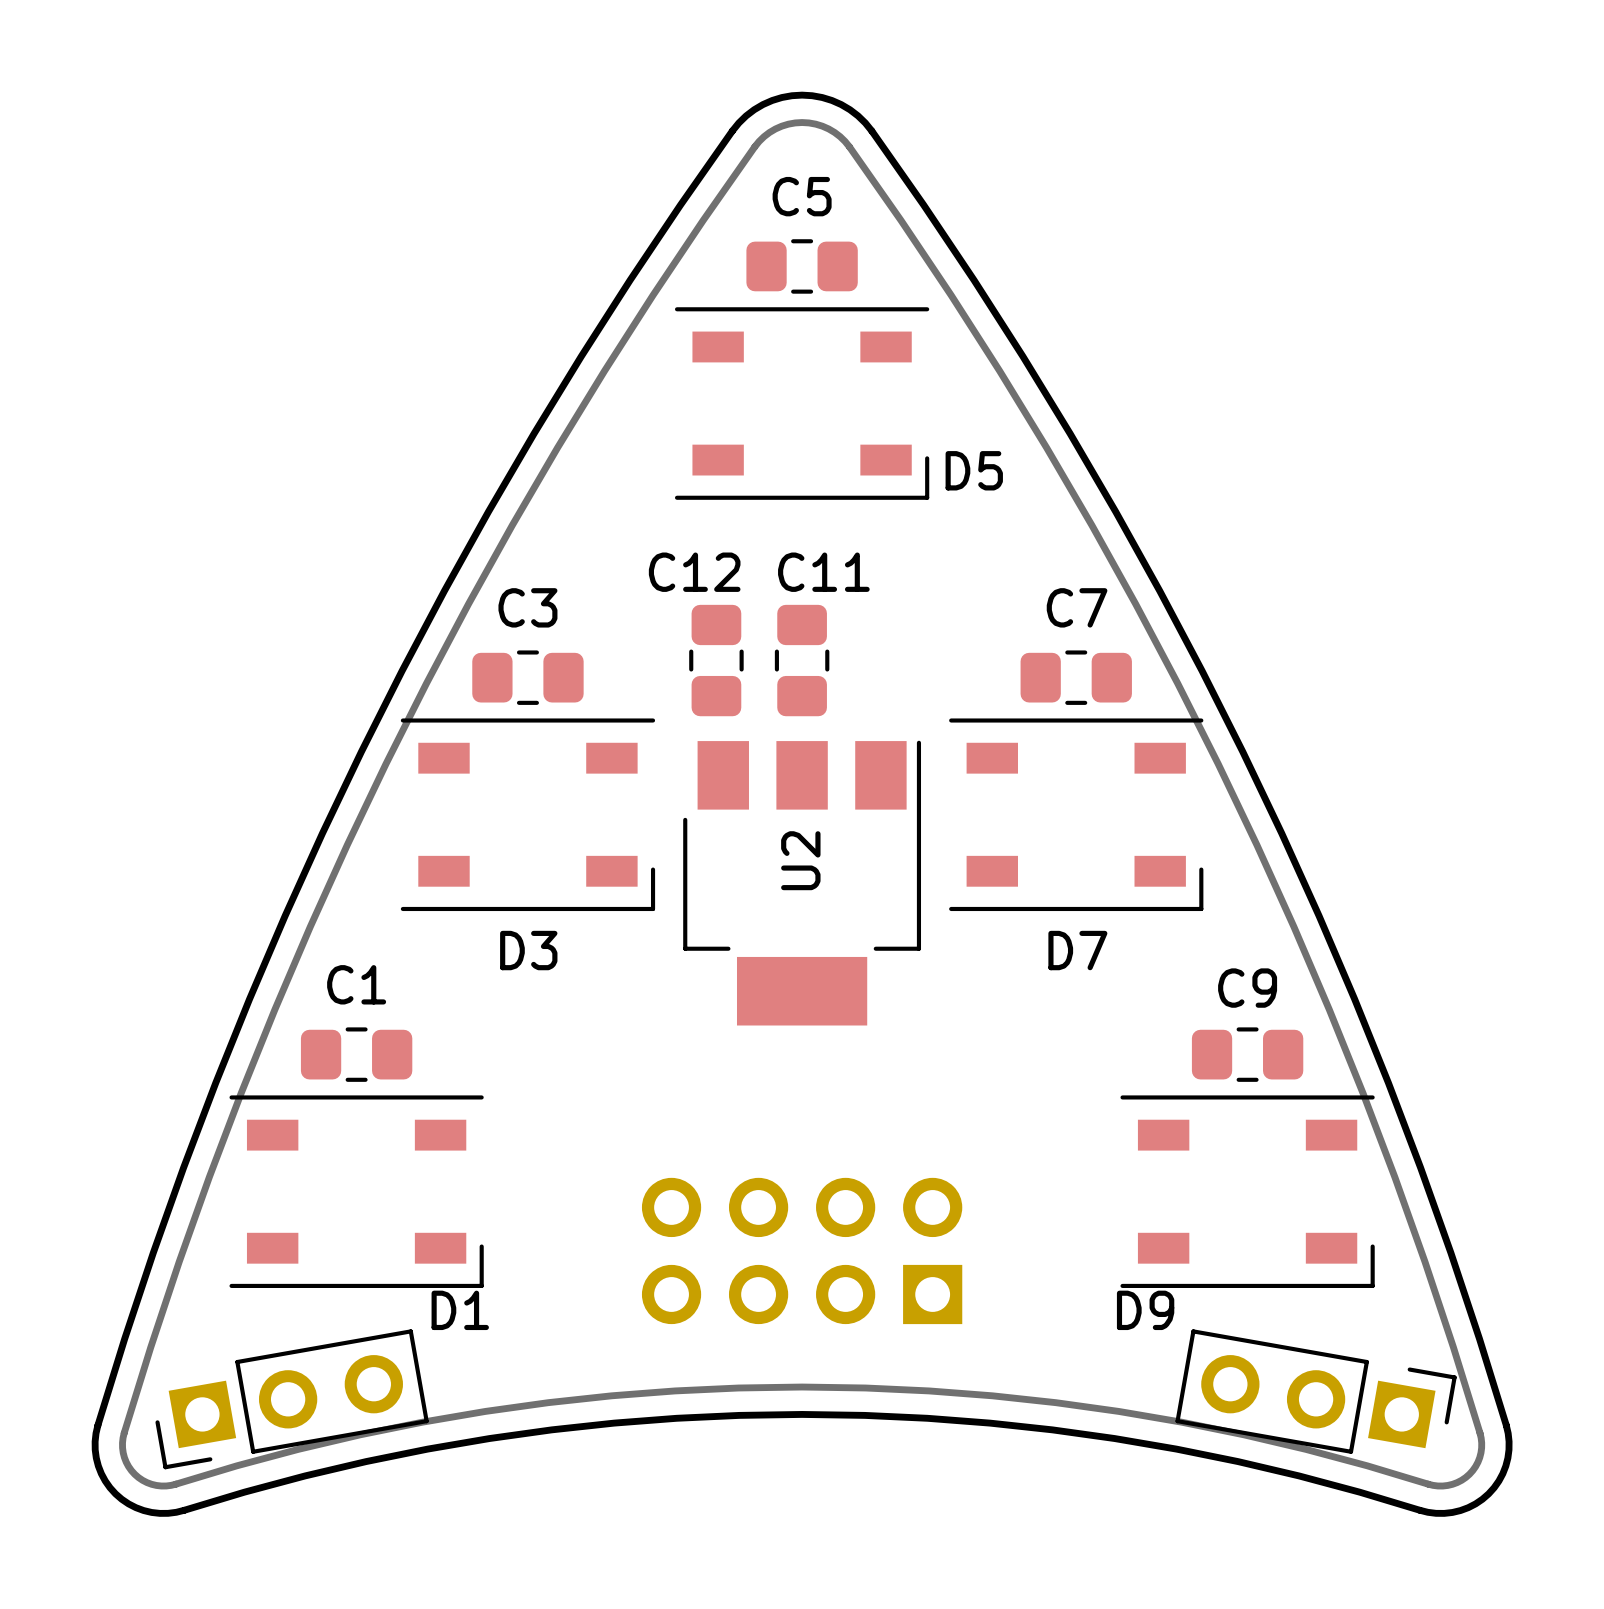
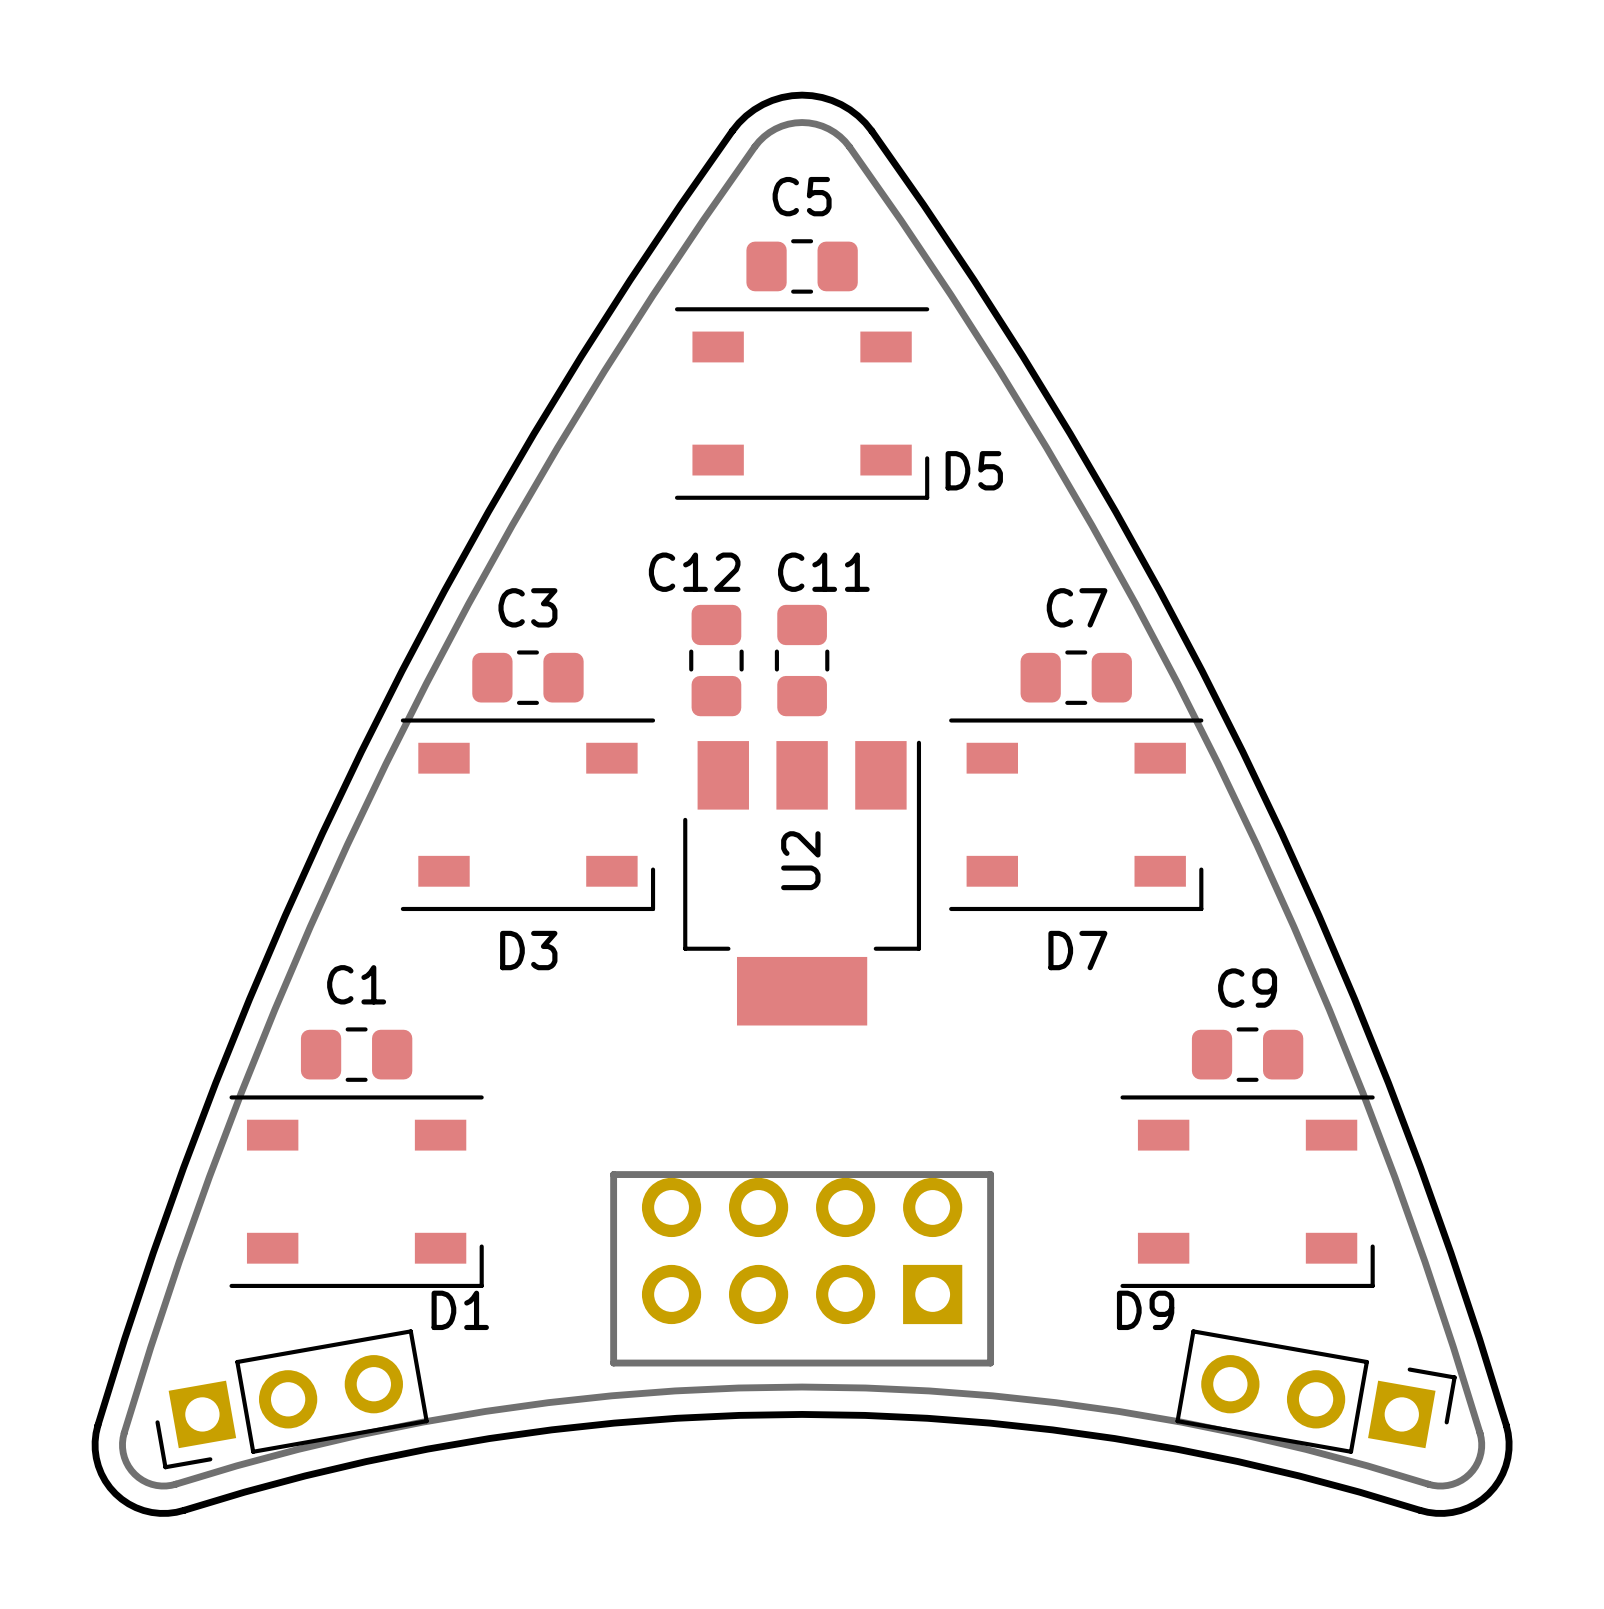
line: none -> (613, 1174) (613, 1363) (990, 1363) (990, 1174) (613, 1174)

